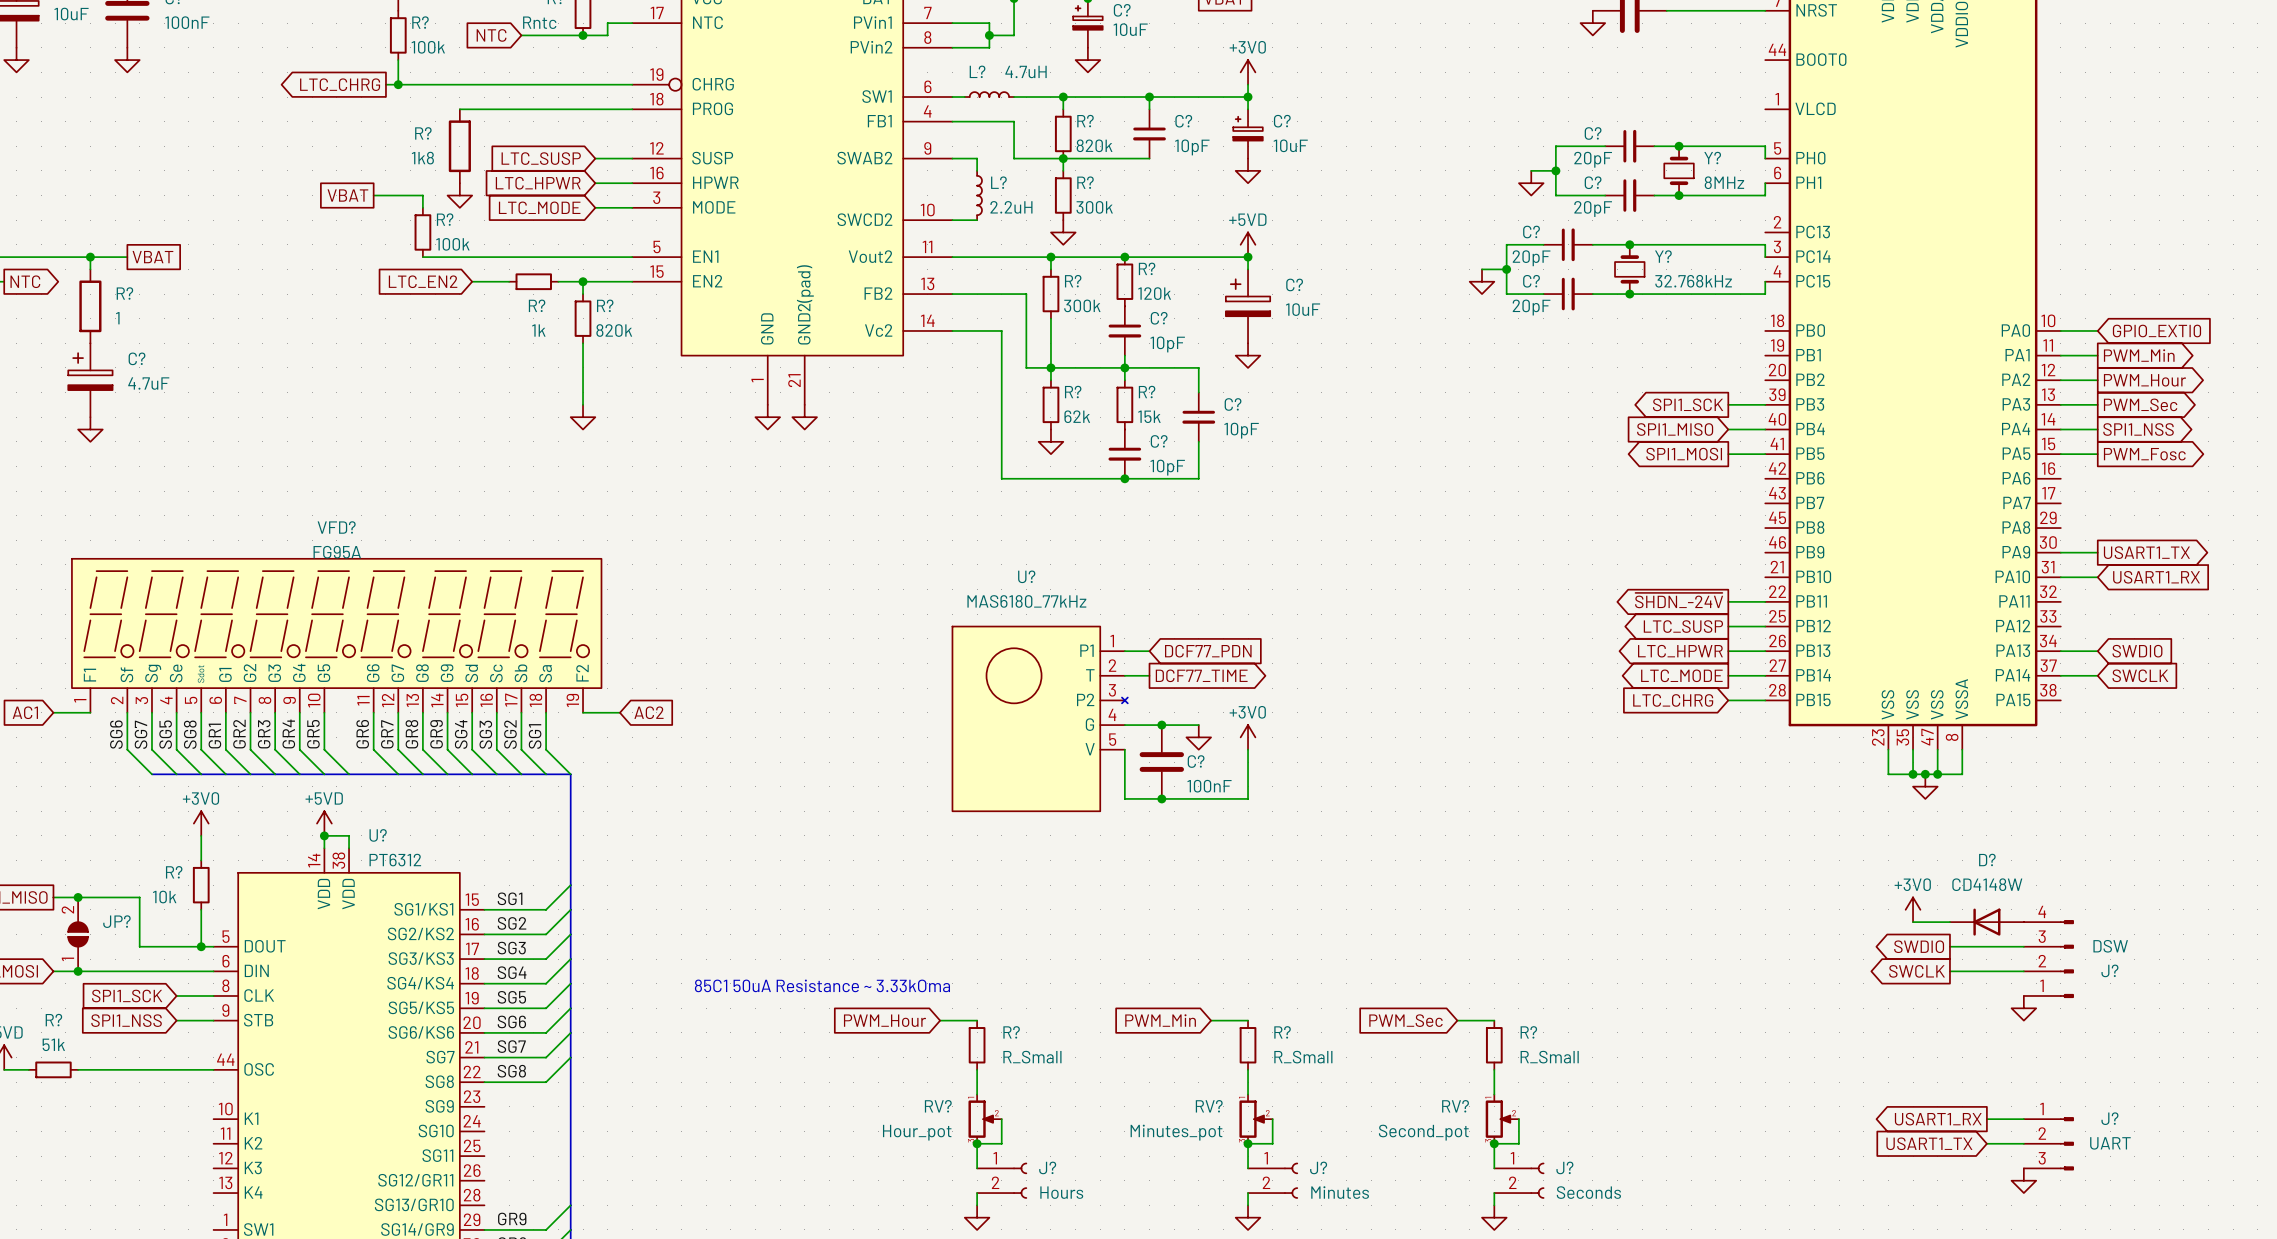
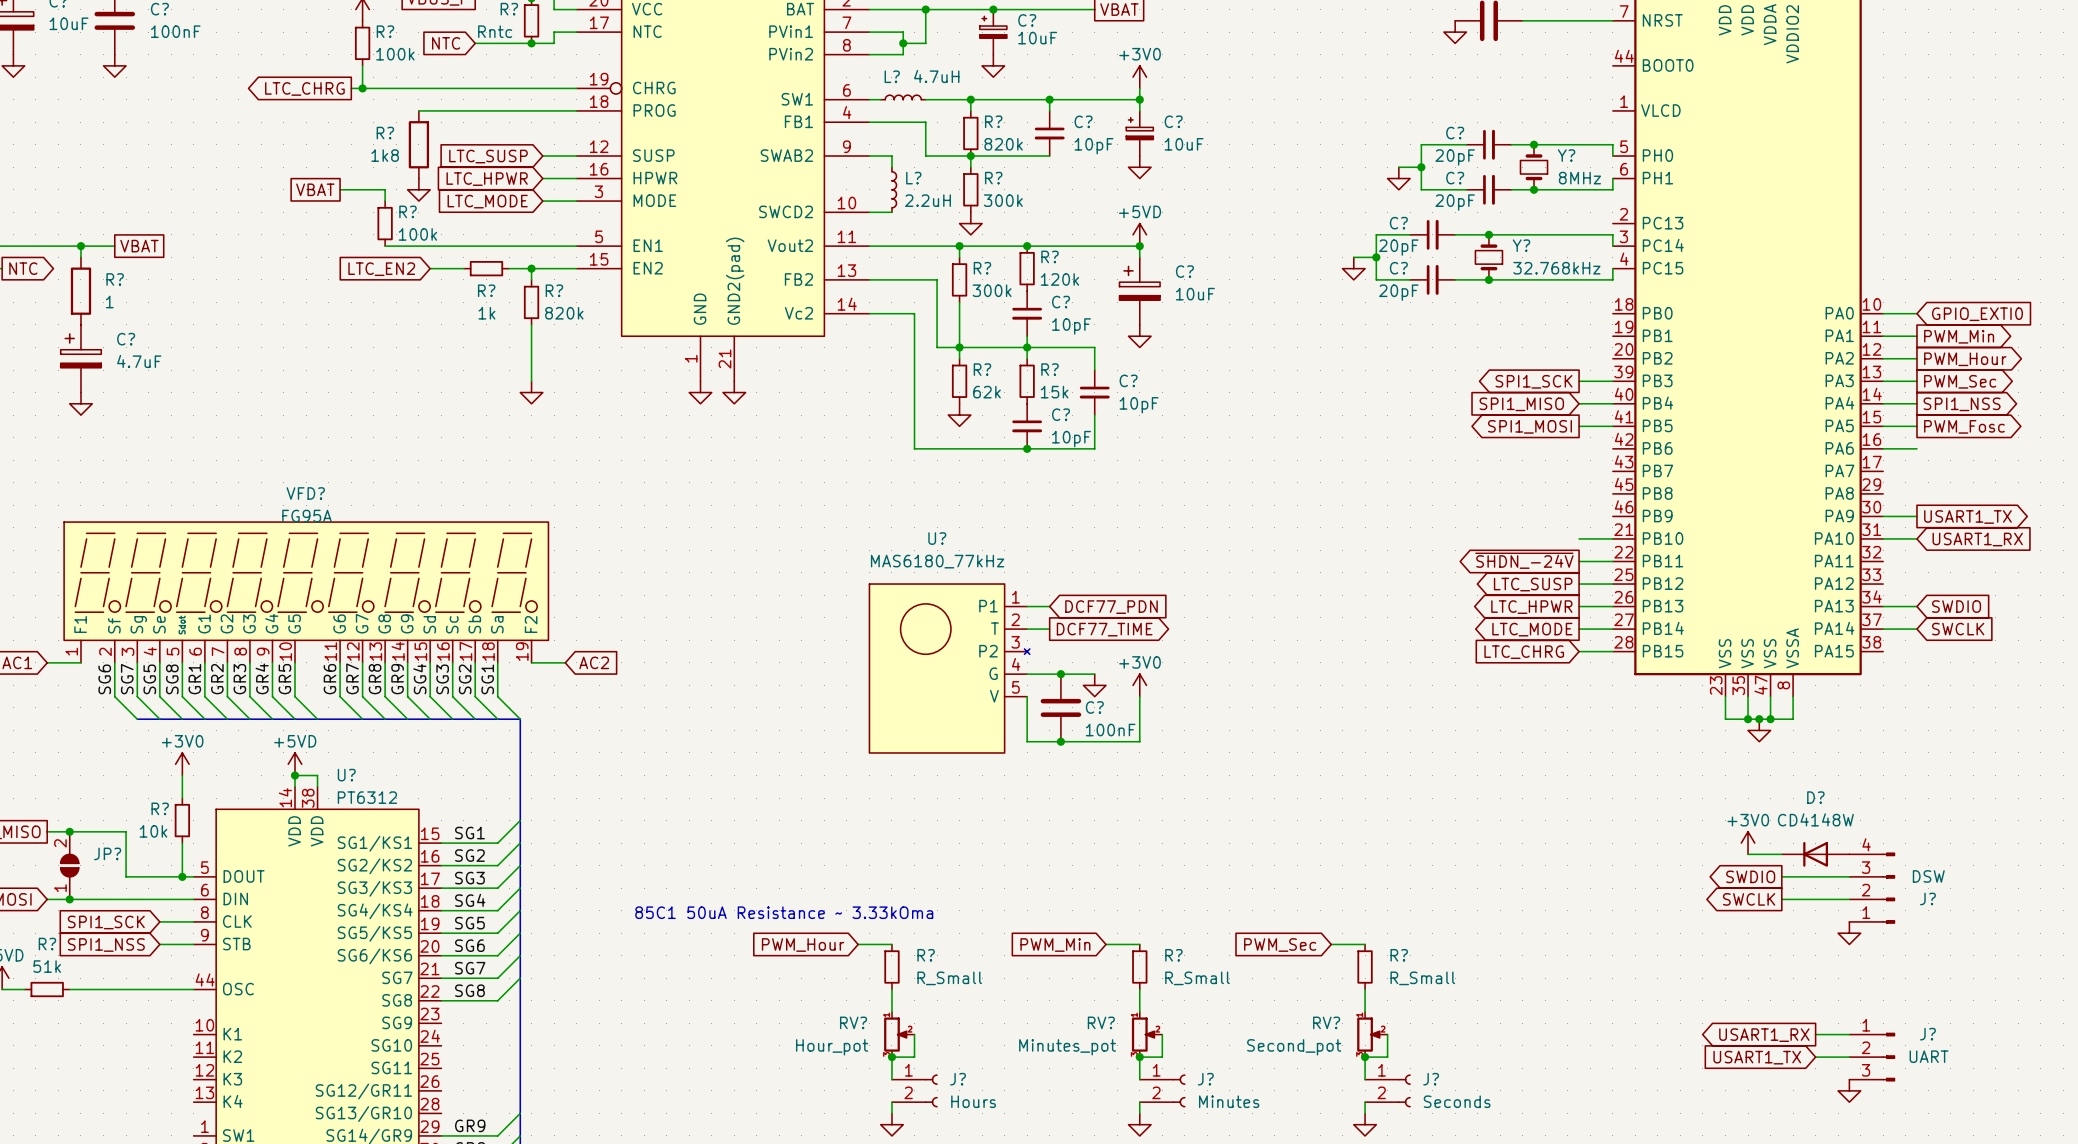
wire: none -> (1883, 448) (1916, 448)
wire: none -> (1579, 538) (1612, 538)

